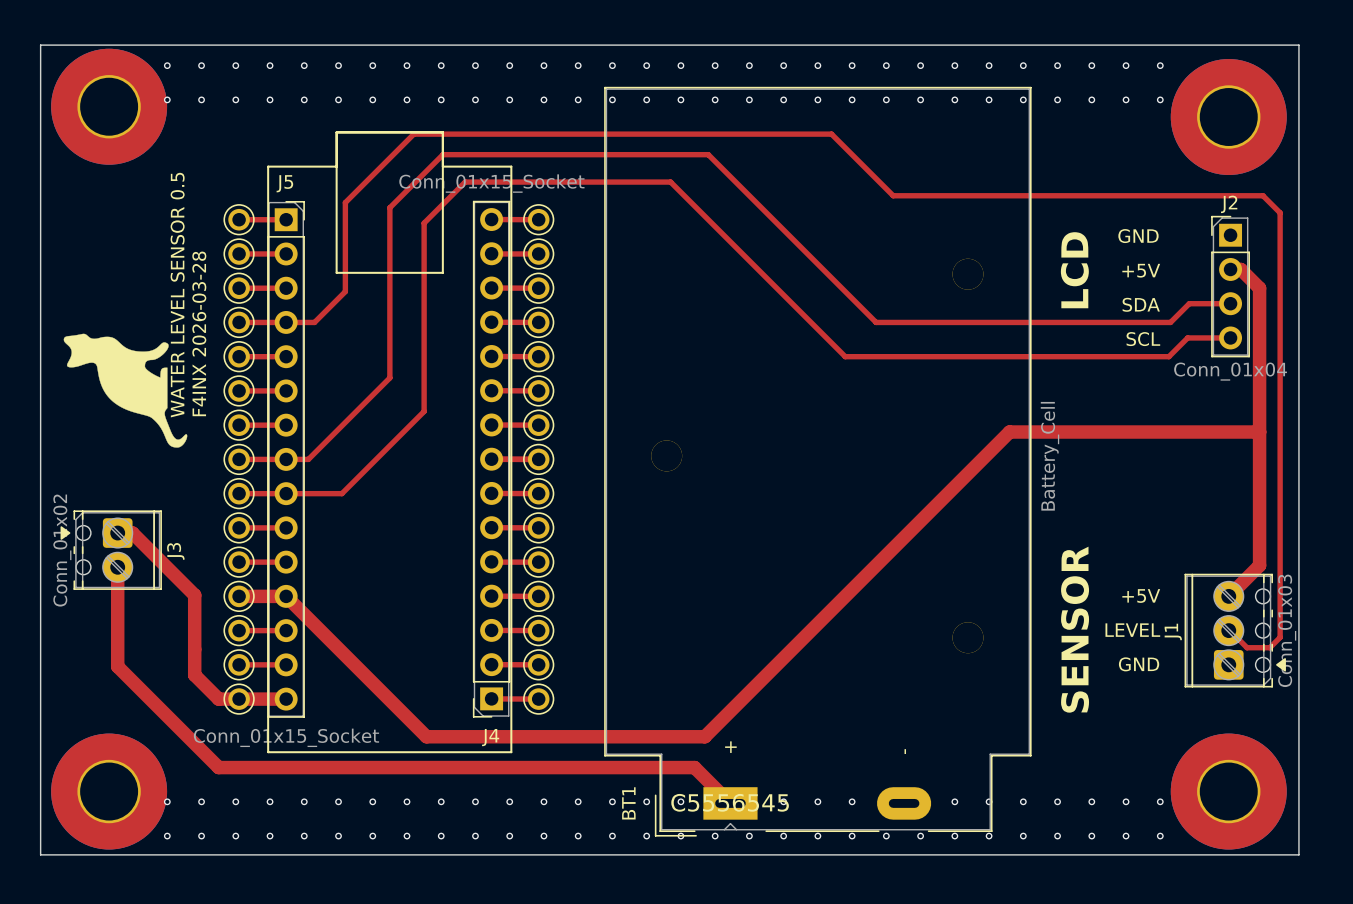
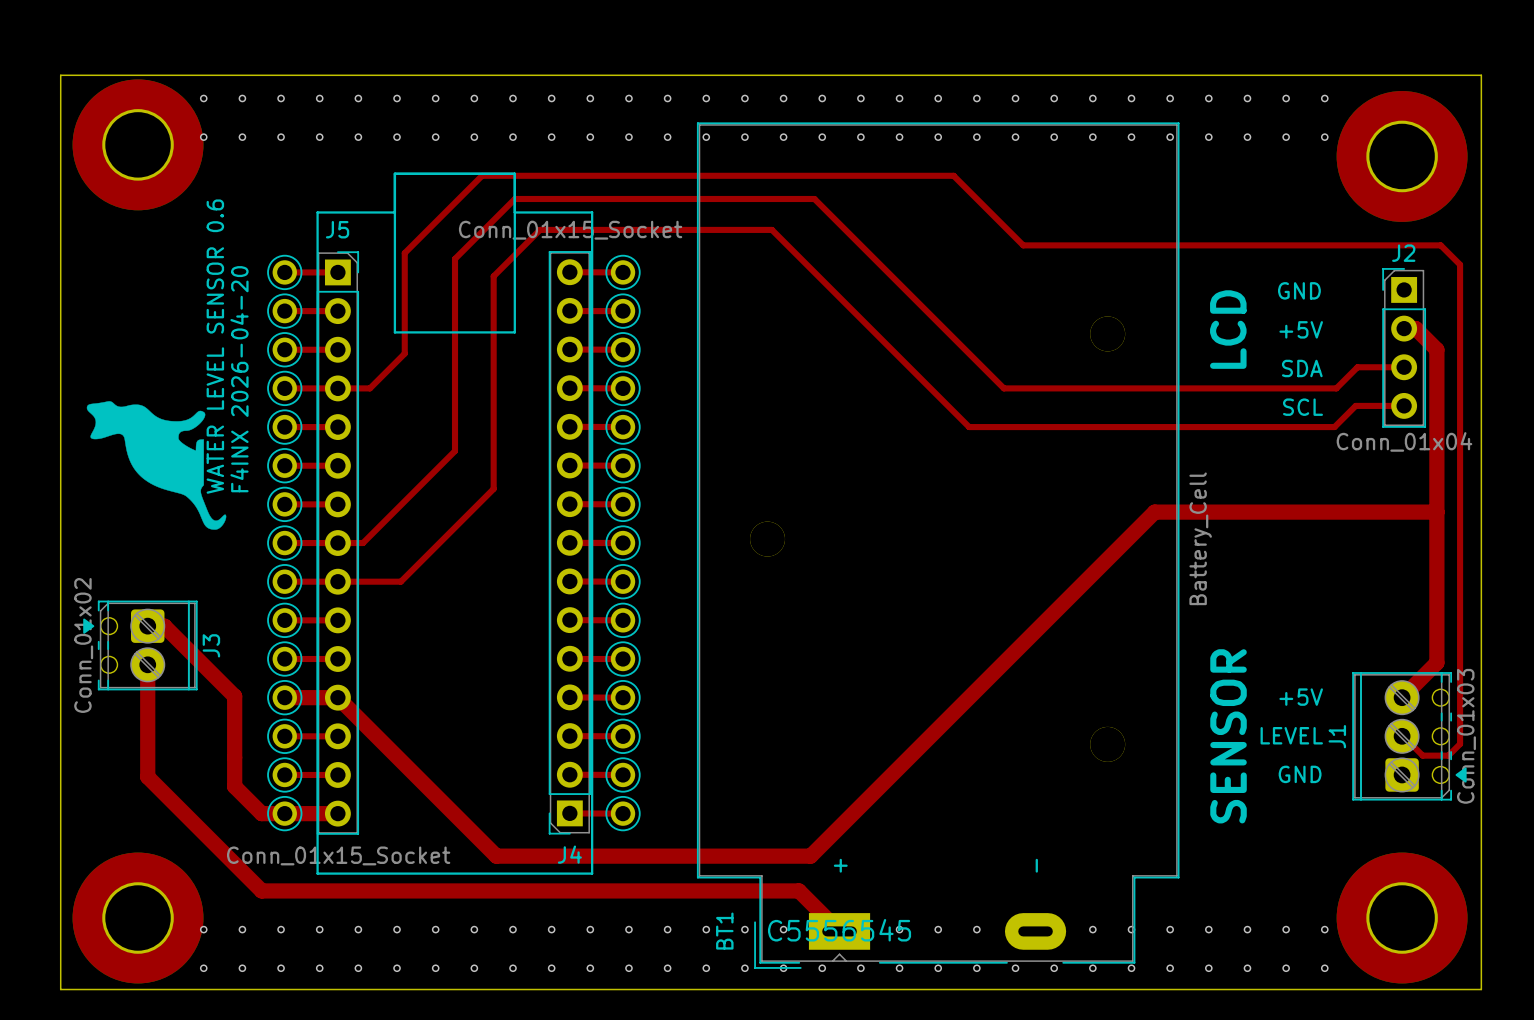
text: WATER LEVEL SENSOR 0.5 (177, 295) -> WATER LEVEL SENSOR 0.6 (215, 346)
text: F4INX 2026-03-28 (199, 333) -> F4INX 2026-04-20 (239, 379)

